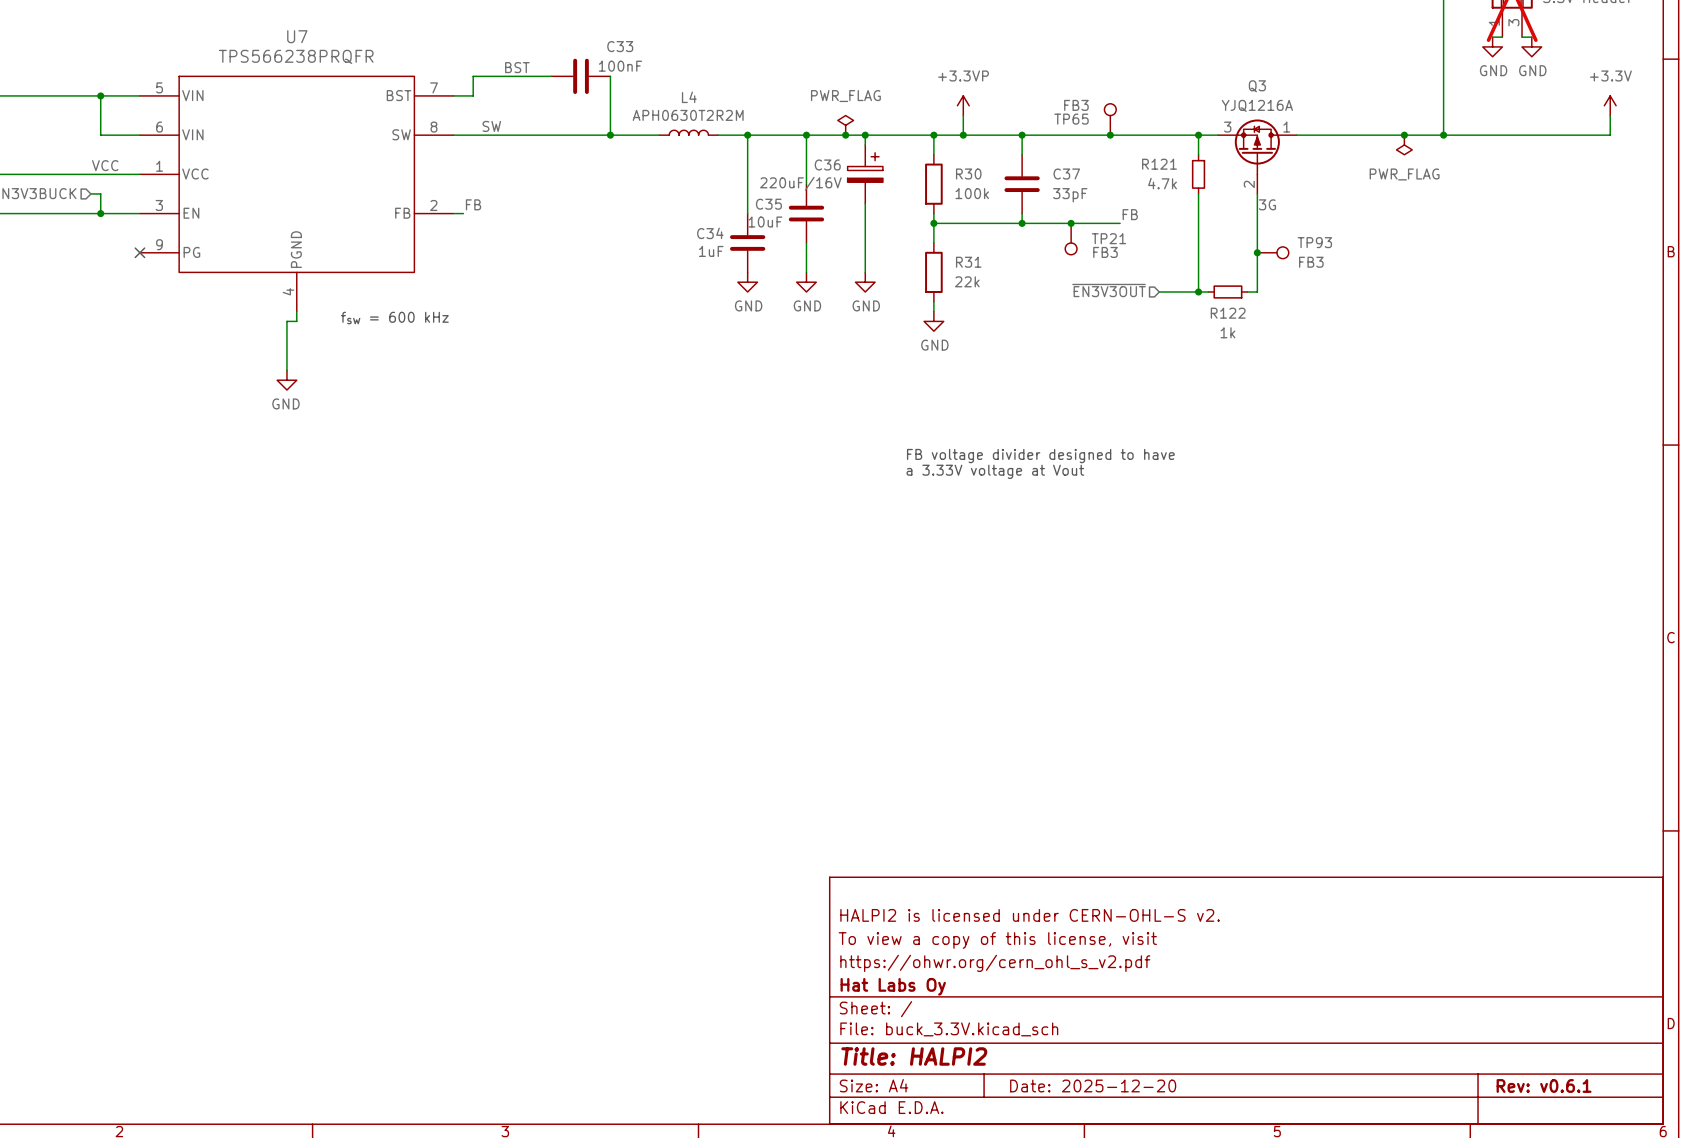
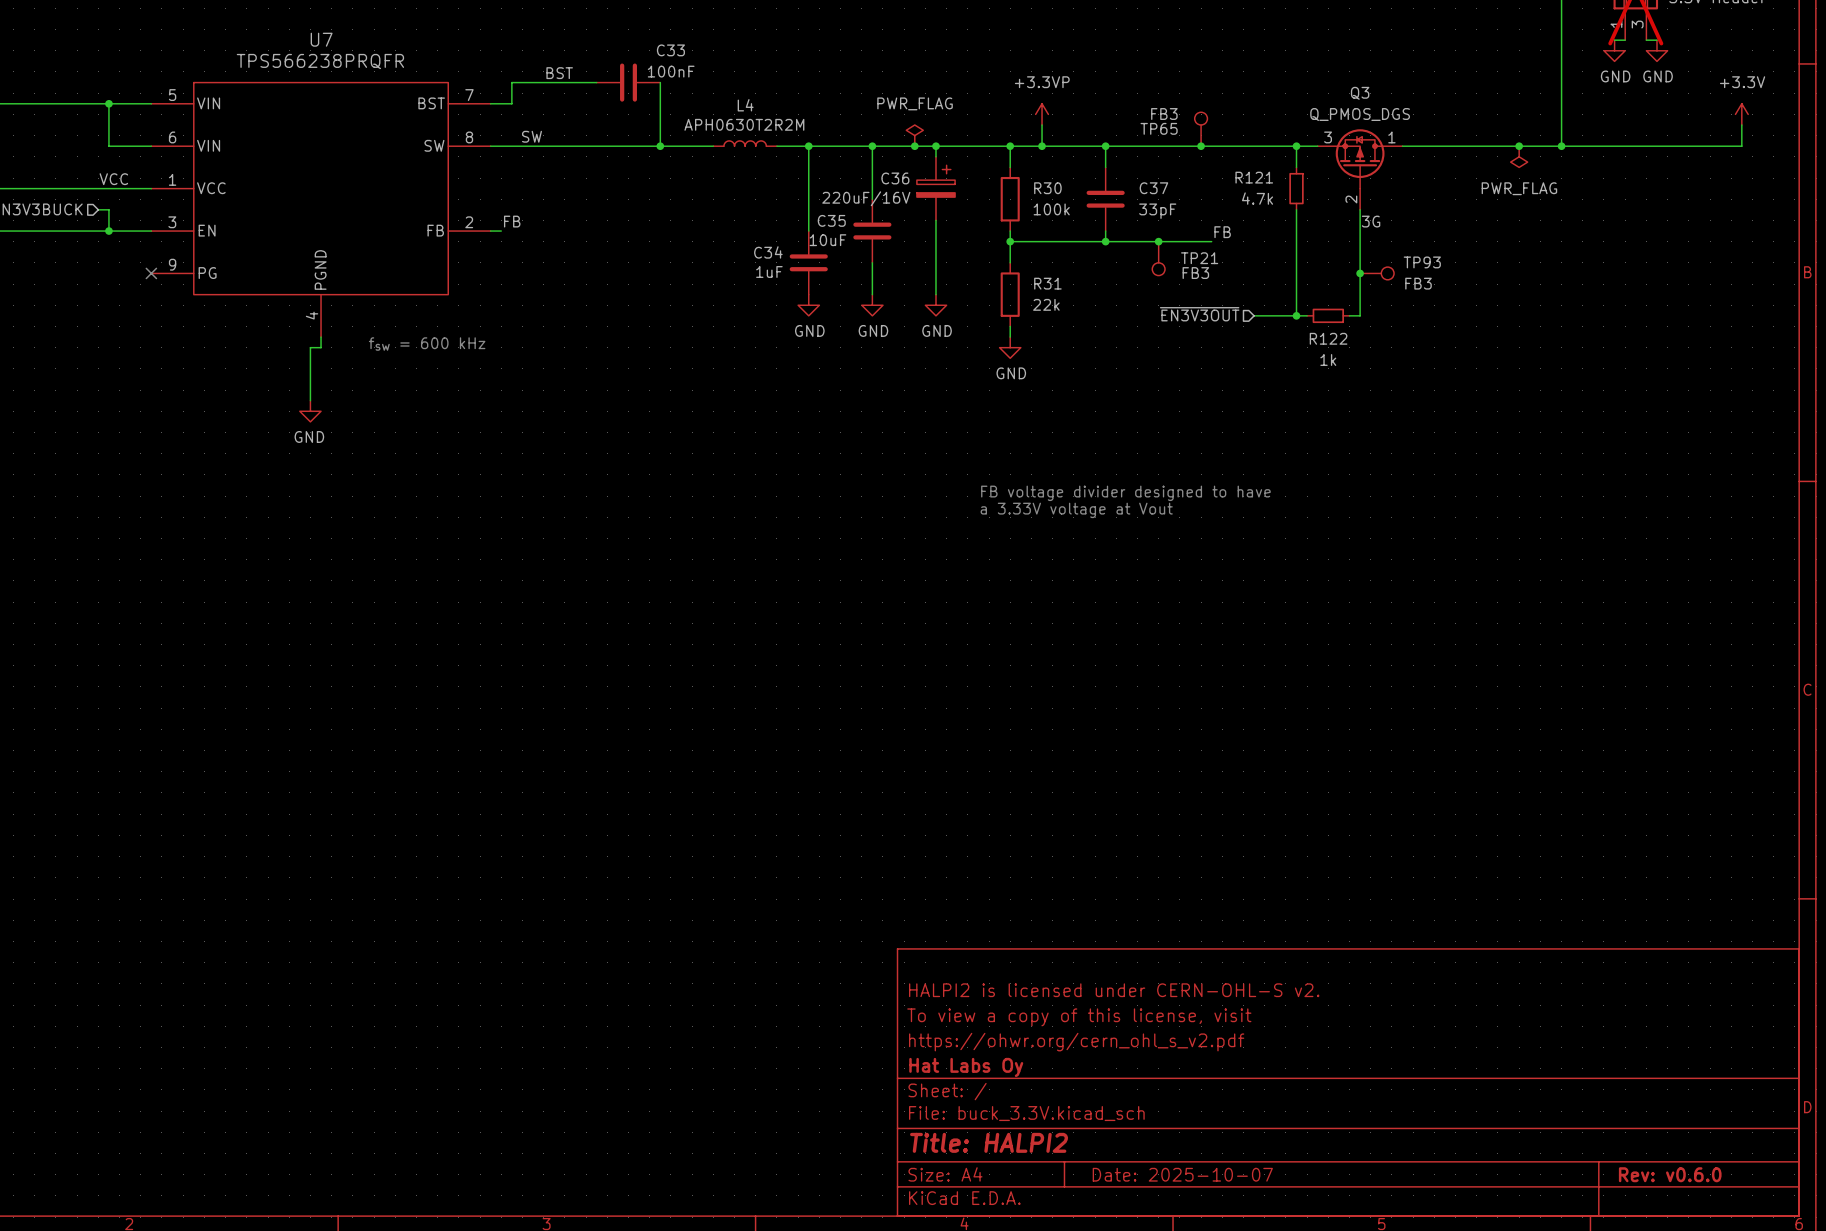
Q3 value: YJQ1216A (1257, 105) -> Q_PMOS_DGS (1360, 114)
title block: Date: 2025-12-20 (1093, 1085) -> Date: 2025-10-07 (1182, 1174)
title block: Rev: v0.6.1 (1544, 1085) -> Rev: v0.6.0 (1670, 1174)

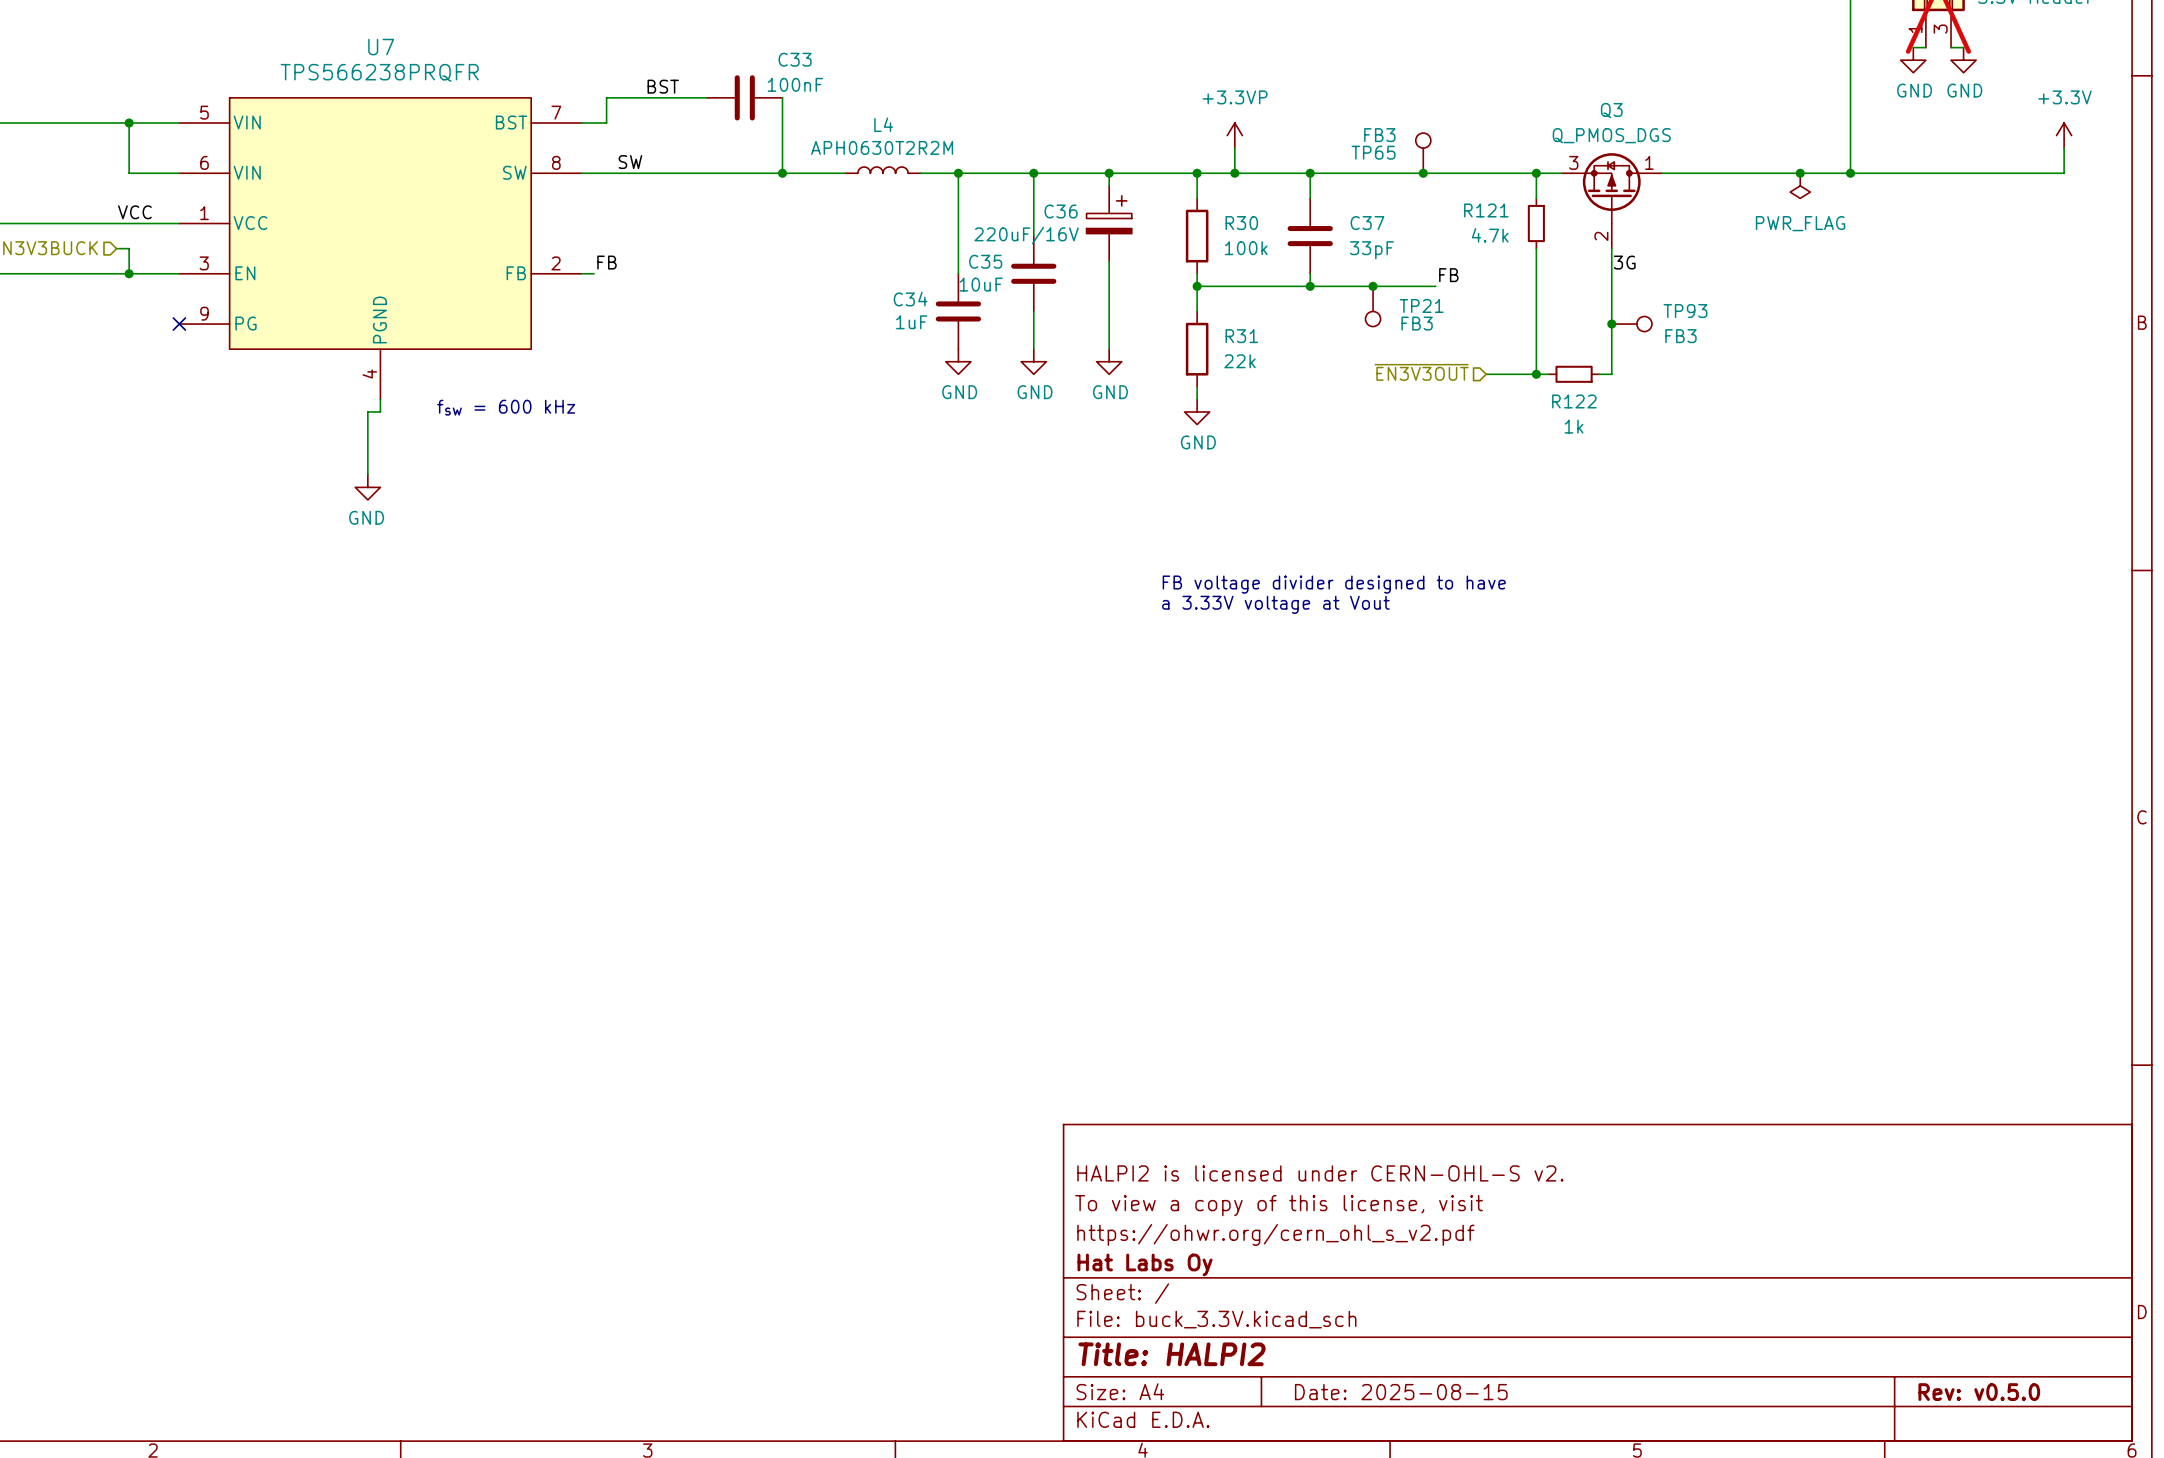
power symbol: PWR_FLAG (914, 135) -> none
junction: (914, 146) -> none
title block: Date: 2025-10-07 (1182, 1174) -> Date: 2025-08-15 (1401, 1392)
title block: Rev: v0.6.0 (1670, 1174) -> Rev: v0.5.0 (1979, 1392)

